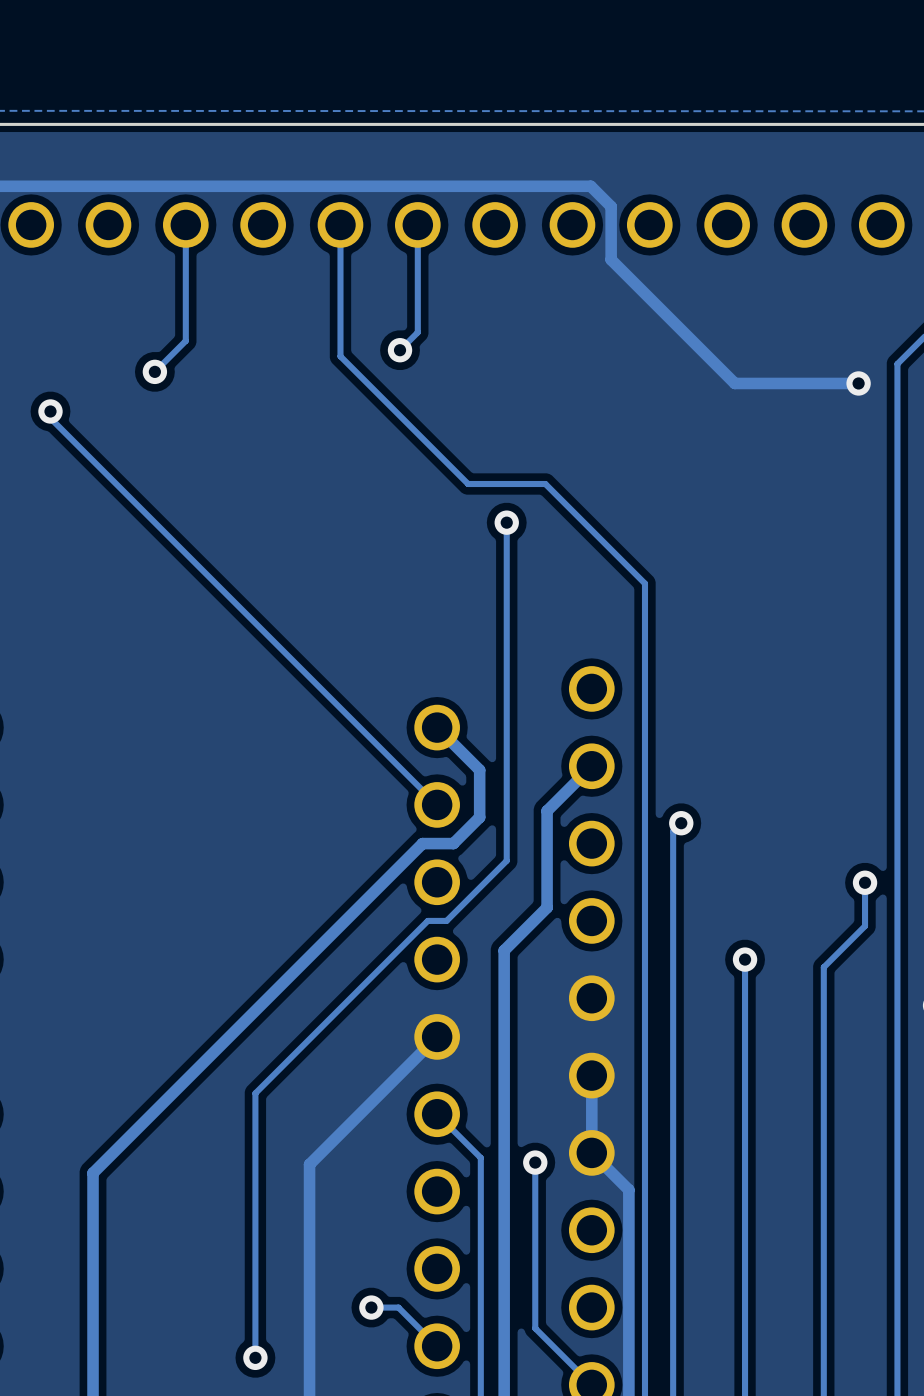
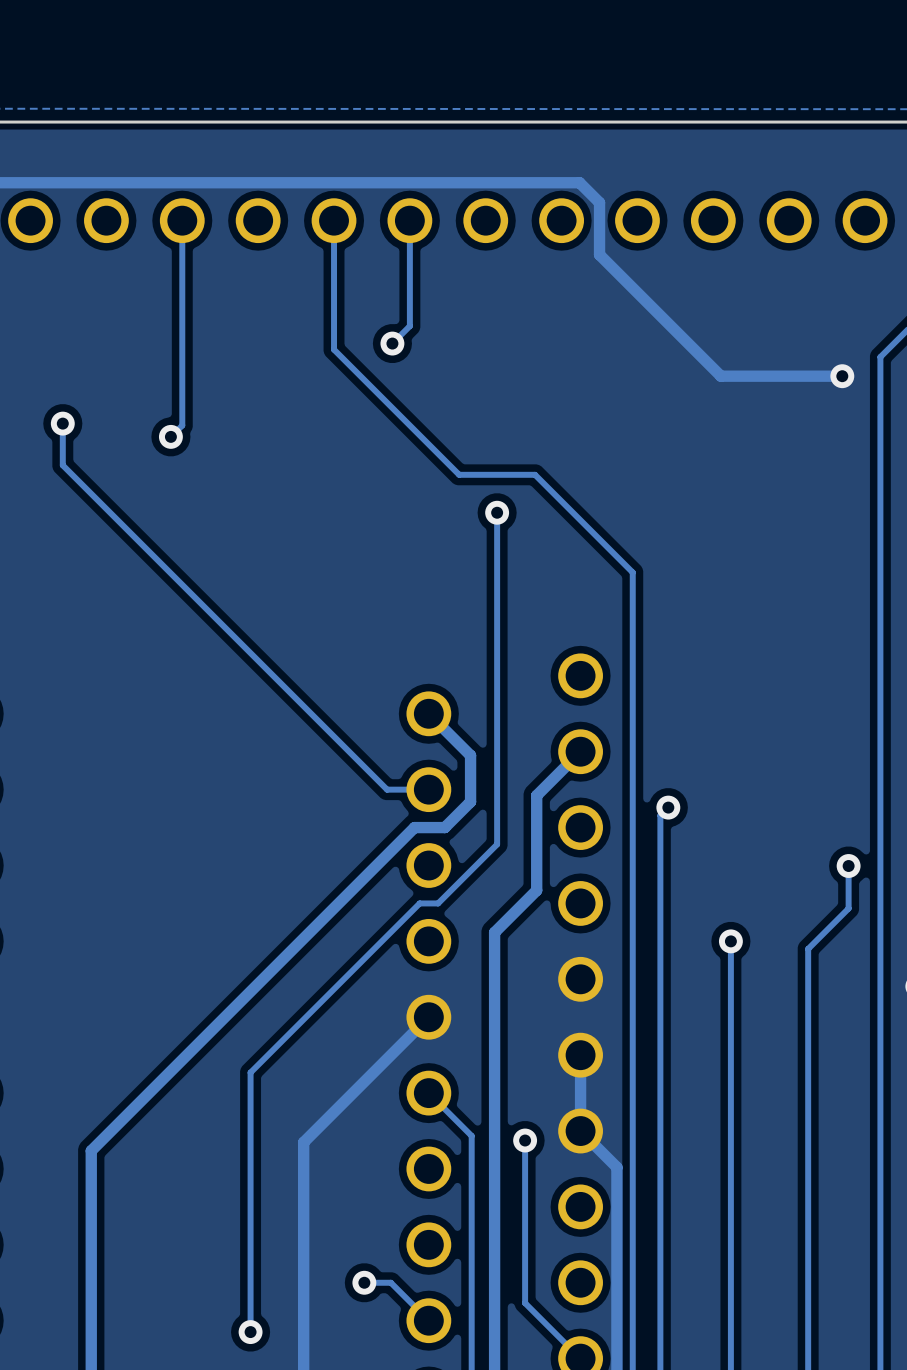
track: (185, 340) (154, 371) -> (182, 334) (182, 425) (170, 436)
via: (154, 371) -> none
track: (50, 411) (50, 418) (437, 804) -> (62, 423) (62, 465) (387, 789) (428, 789)
via position: (50, 411) -> (62, 423)
via: none -> (170, 436)

